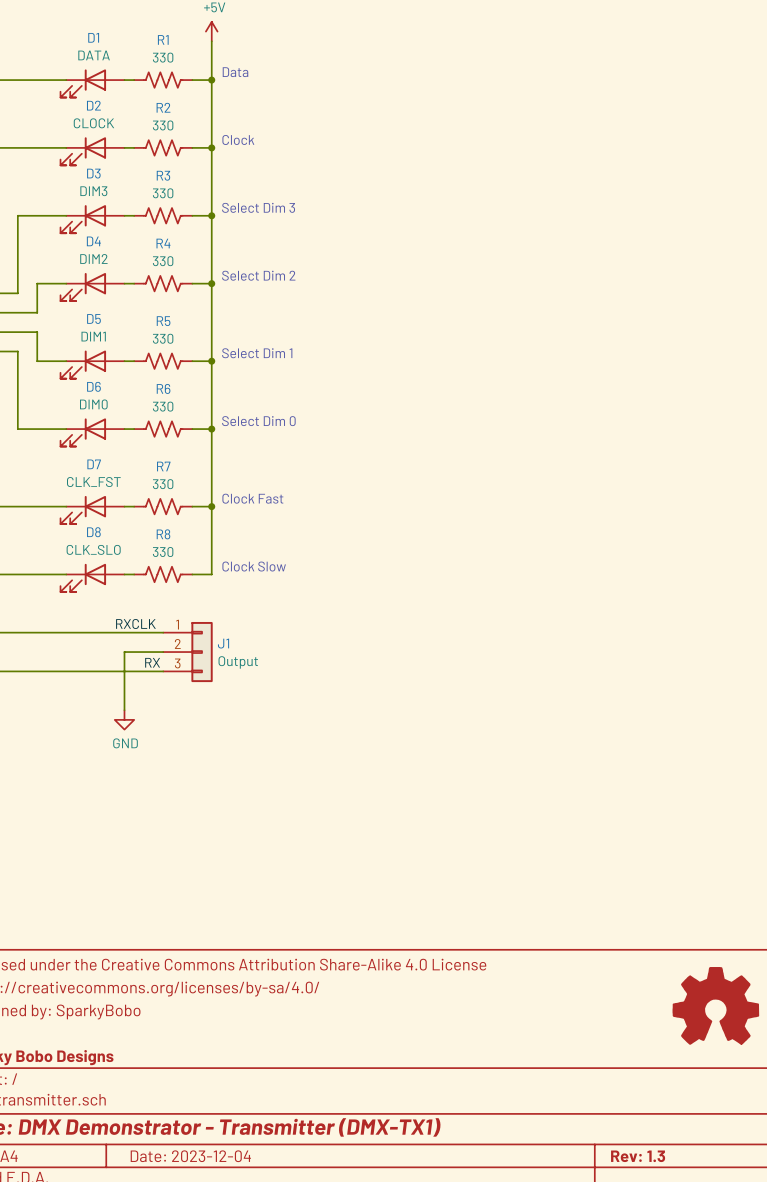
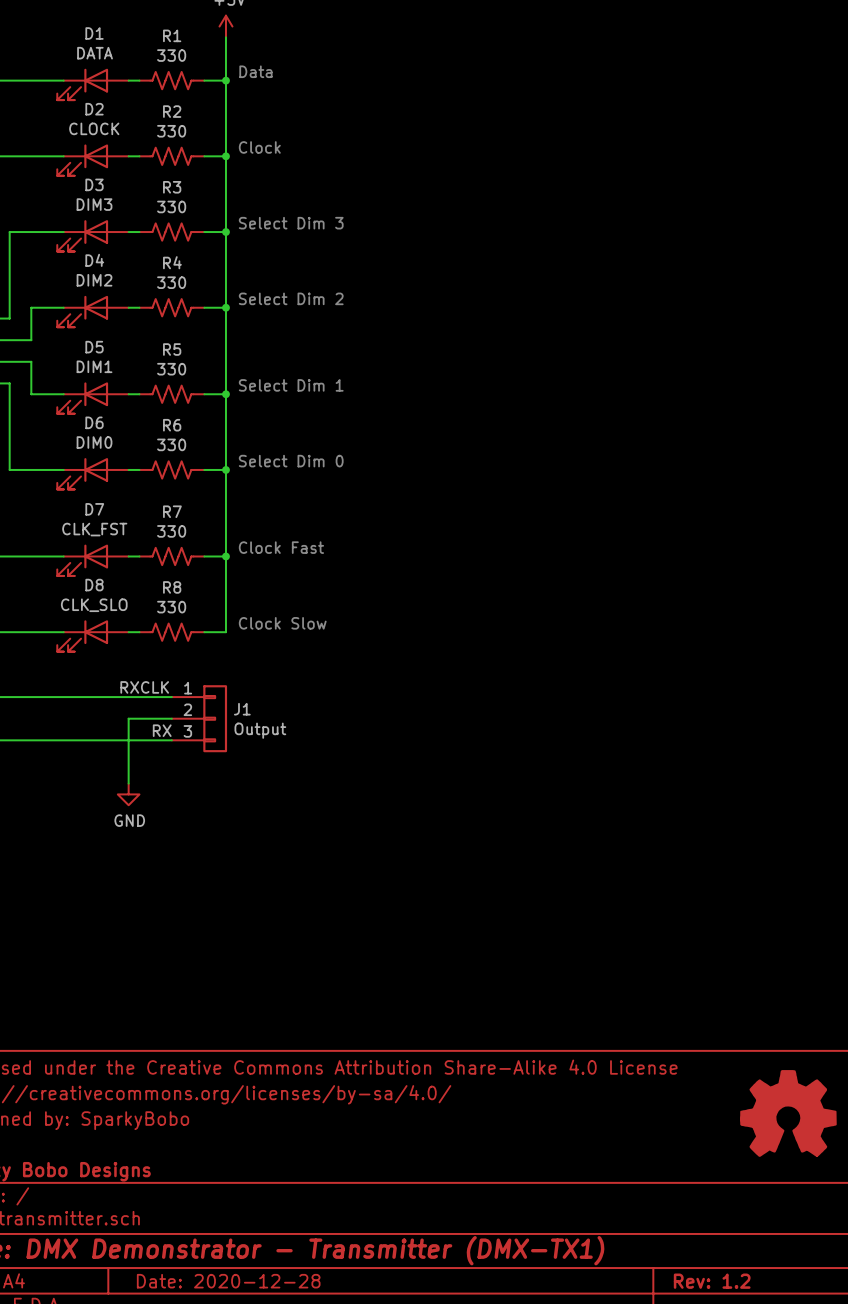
title block: Date: 2023-12-04 (190, 1156) -> Date: 2020-12-28 (228, 1281)
title block: Rev: 1.3 (638, 1156) -> Rev: 1.2 (712, 1281)

